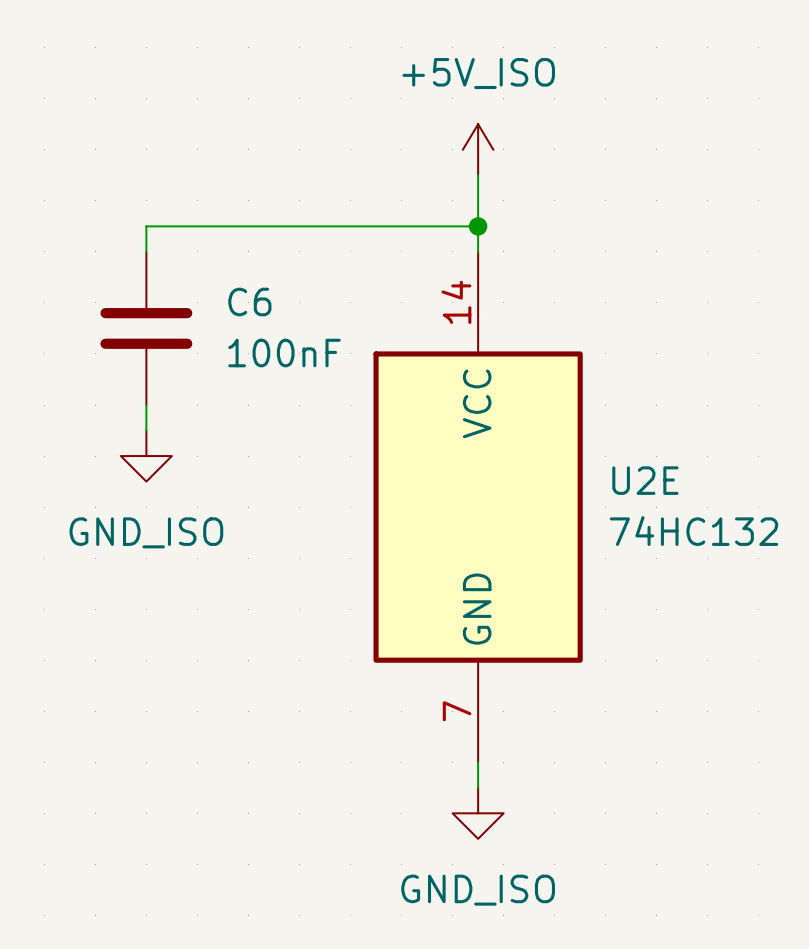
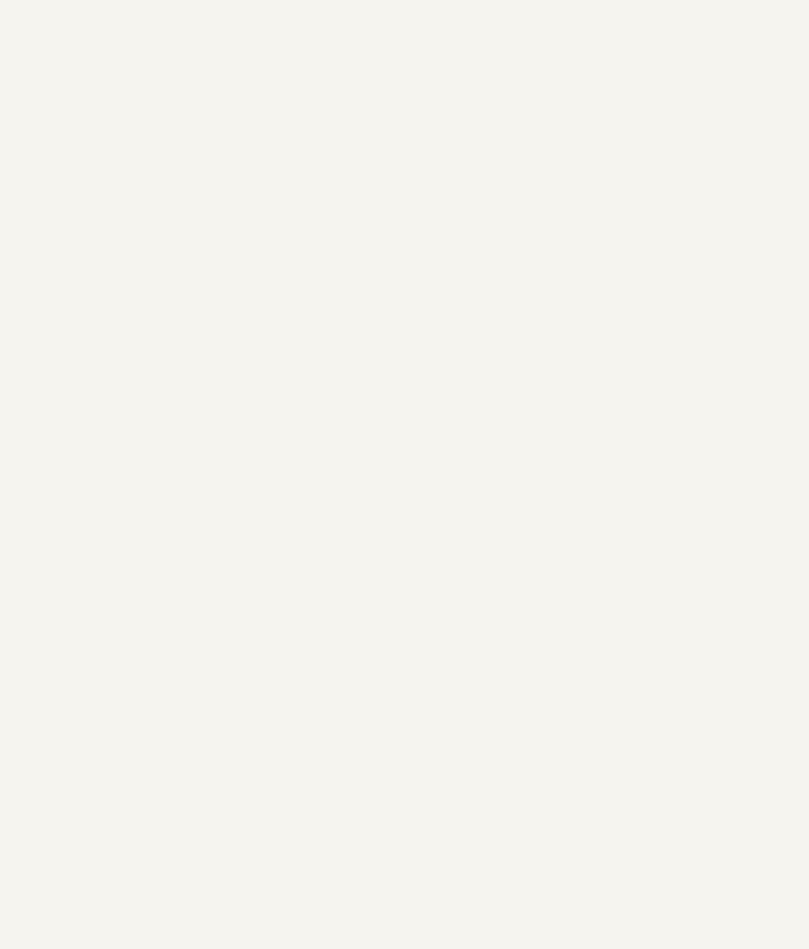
power symbol: +5V_ISO (478, 149) -> none
wire: (478, 175) (478, 251) -> none
wire: (478, 226) (146, 226) (146, 251) -> none
junction: (478, 226) -> none
C6: 100nF (146, 328) -> none
wire: (146, 405) (146, 430) -> none
power symbol: GND_ISO (146, 456) -> none
U2E: 74HC132 (478, 507) -> none
wire: (478, 762) (478, 787) -> none
power symbol: GND_ISO (478, 813) -> none

